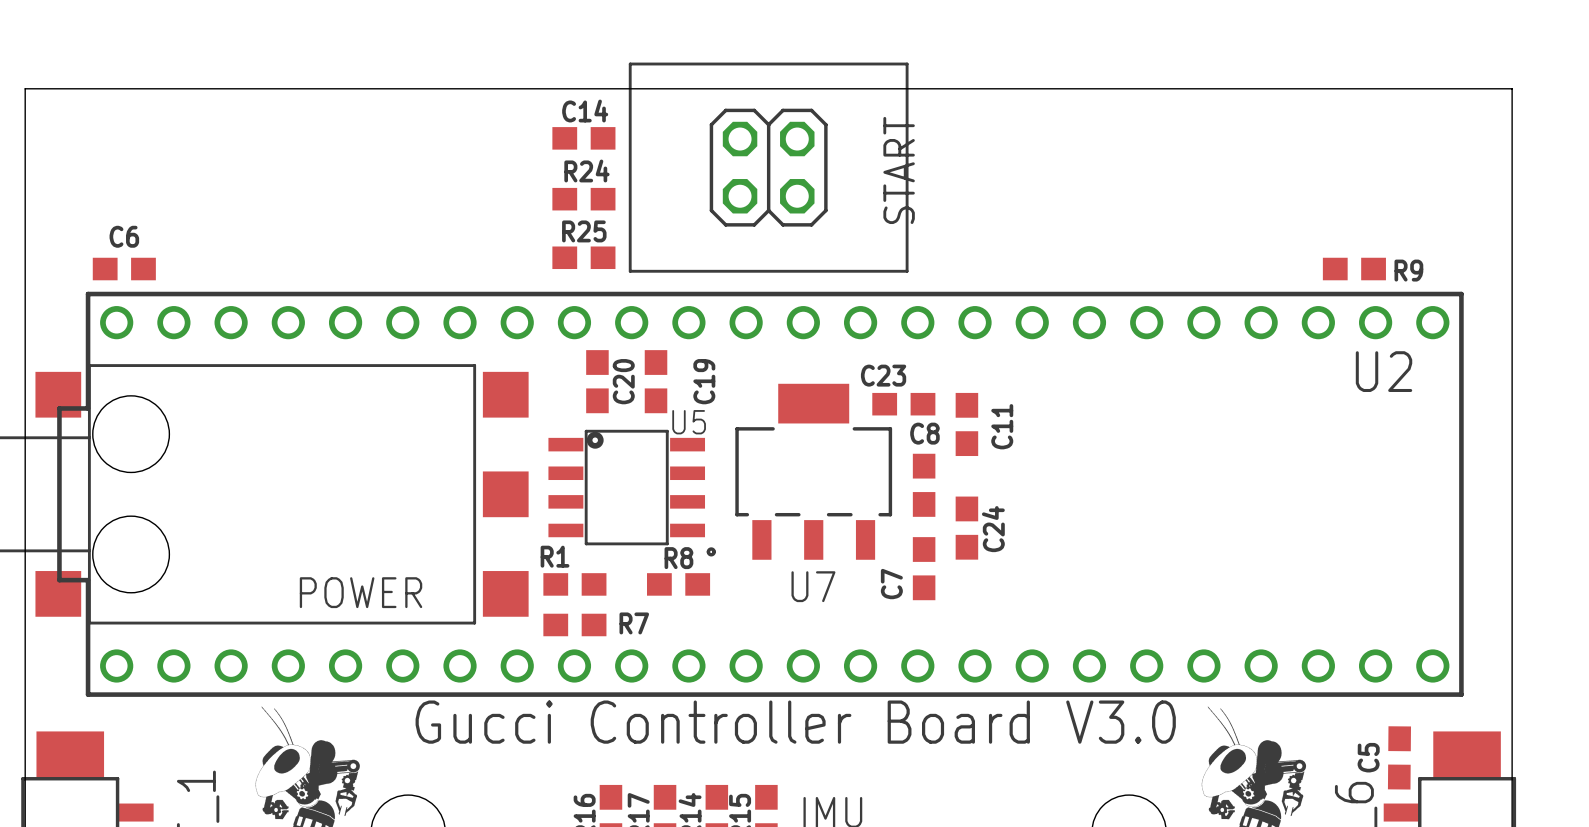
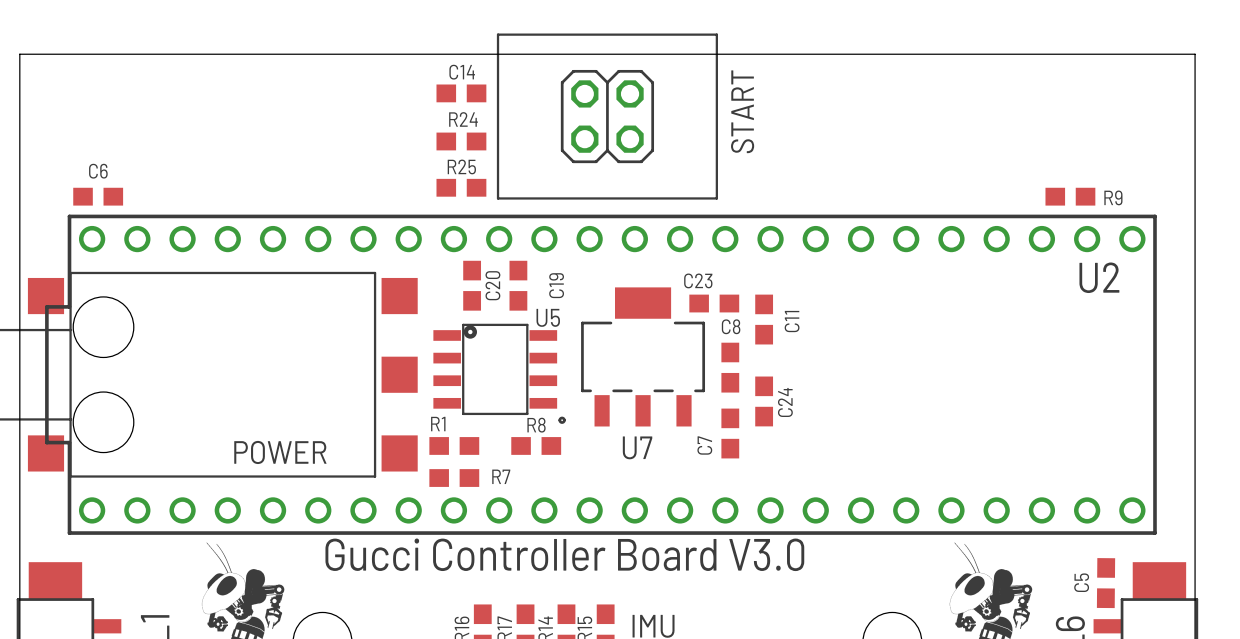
START name position: START (899, 170) -> START (742, 111)

